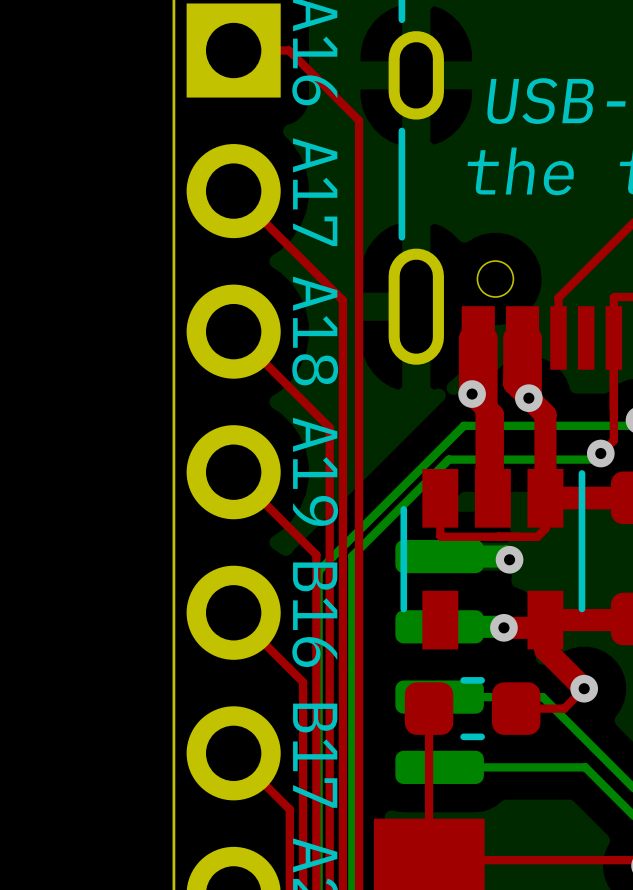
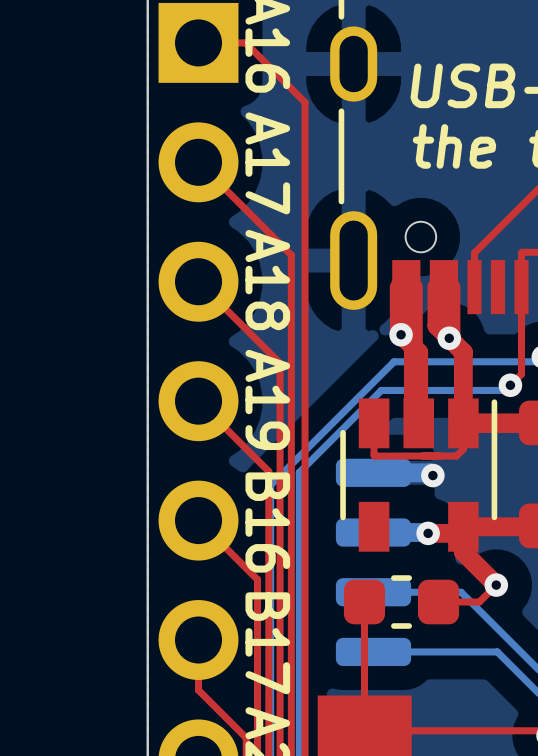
top track: (233, 753) (289, 809) (289, 868) -> (198, 640) (198, 690) (246, 737)

